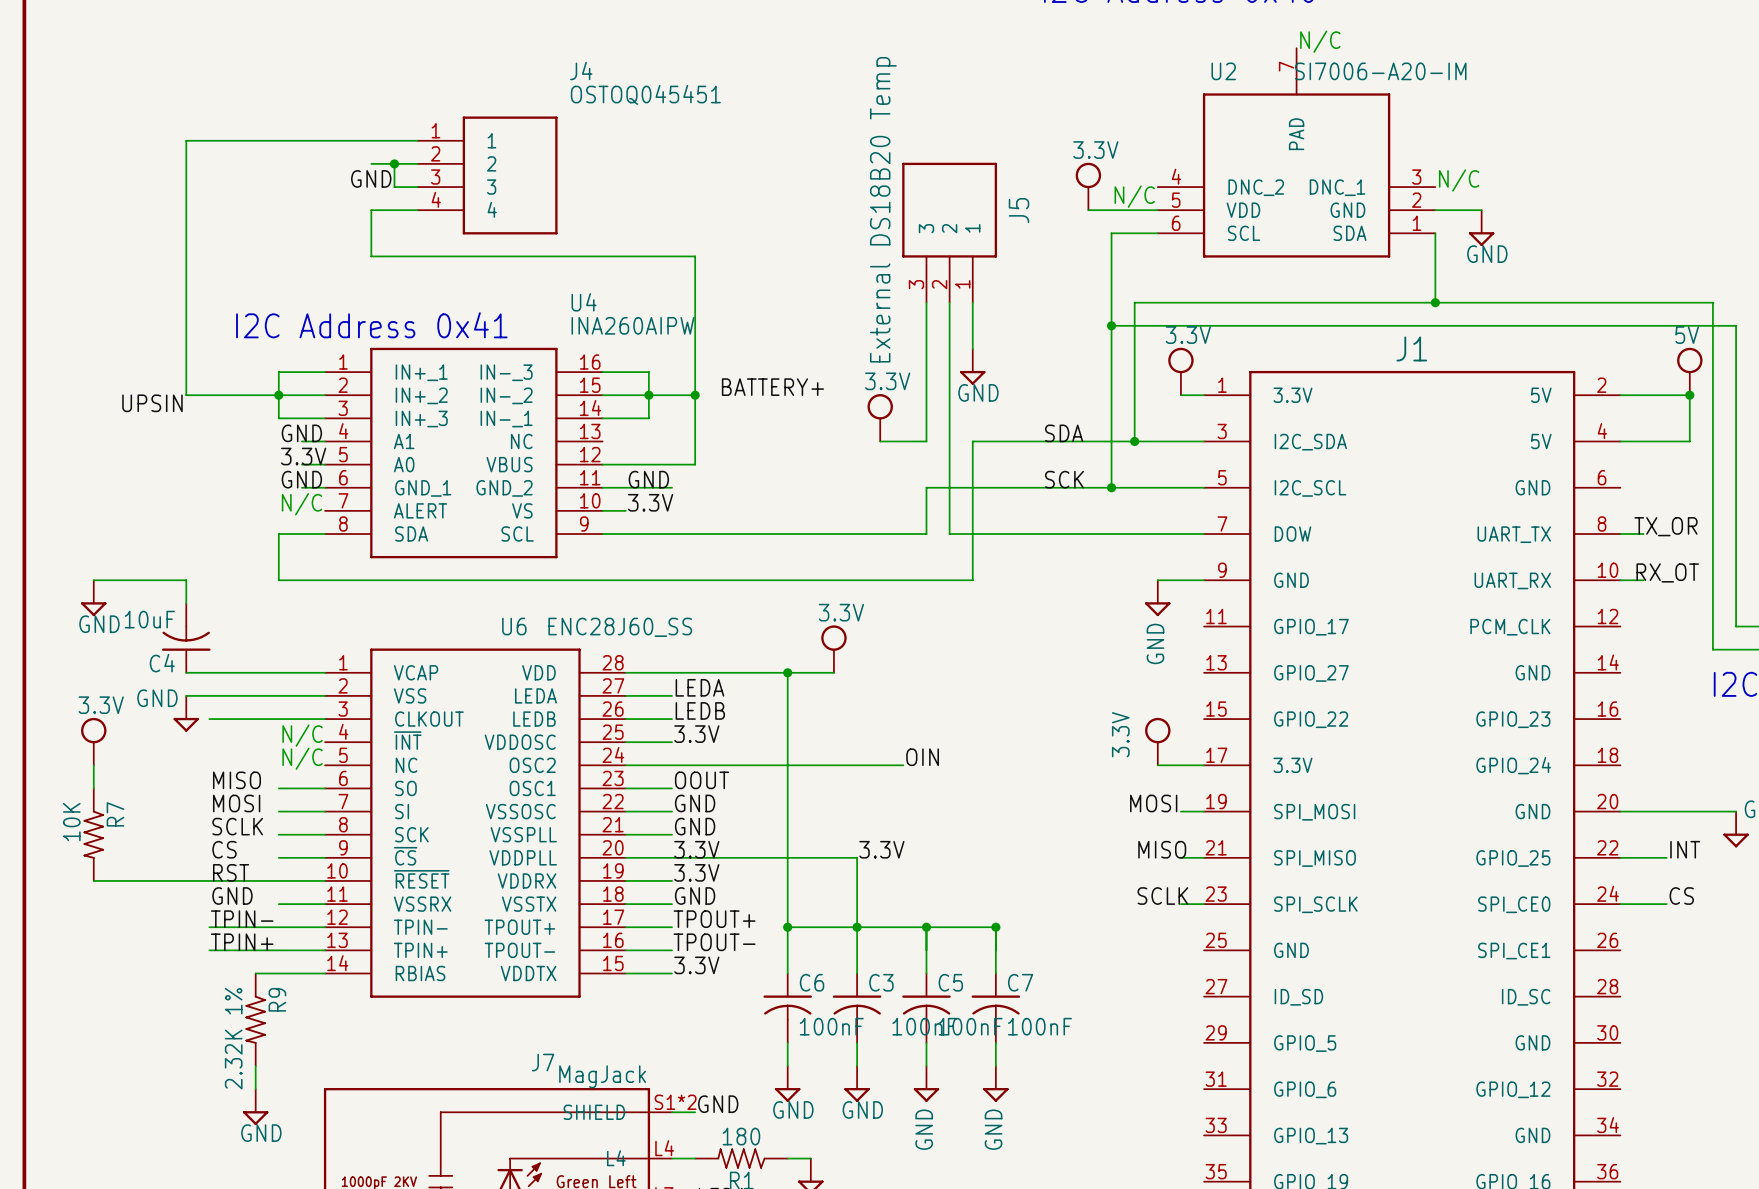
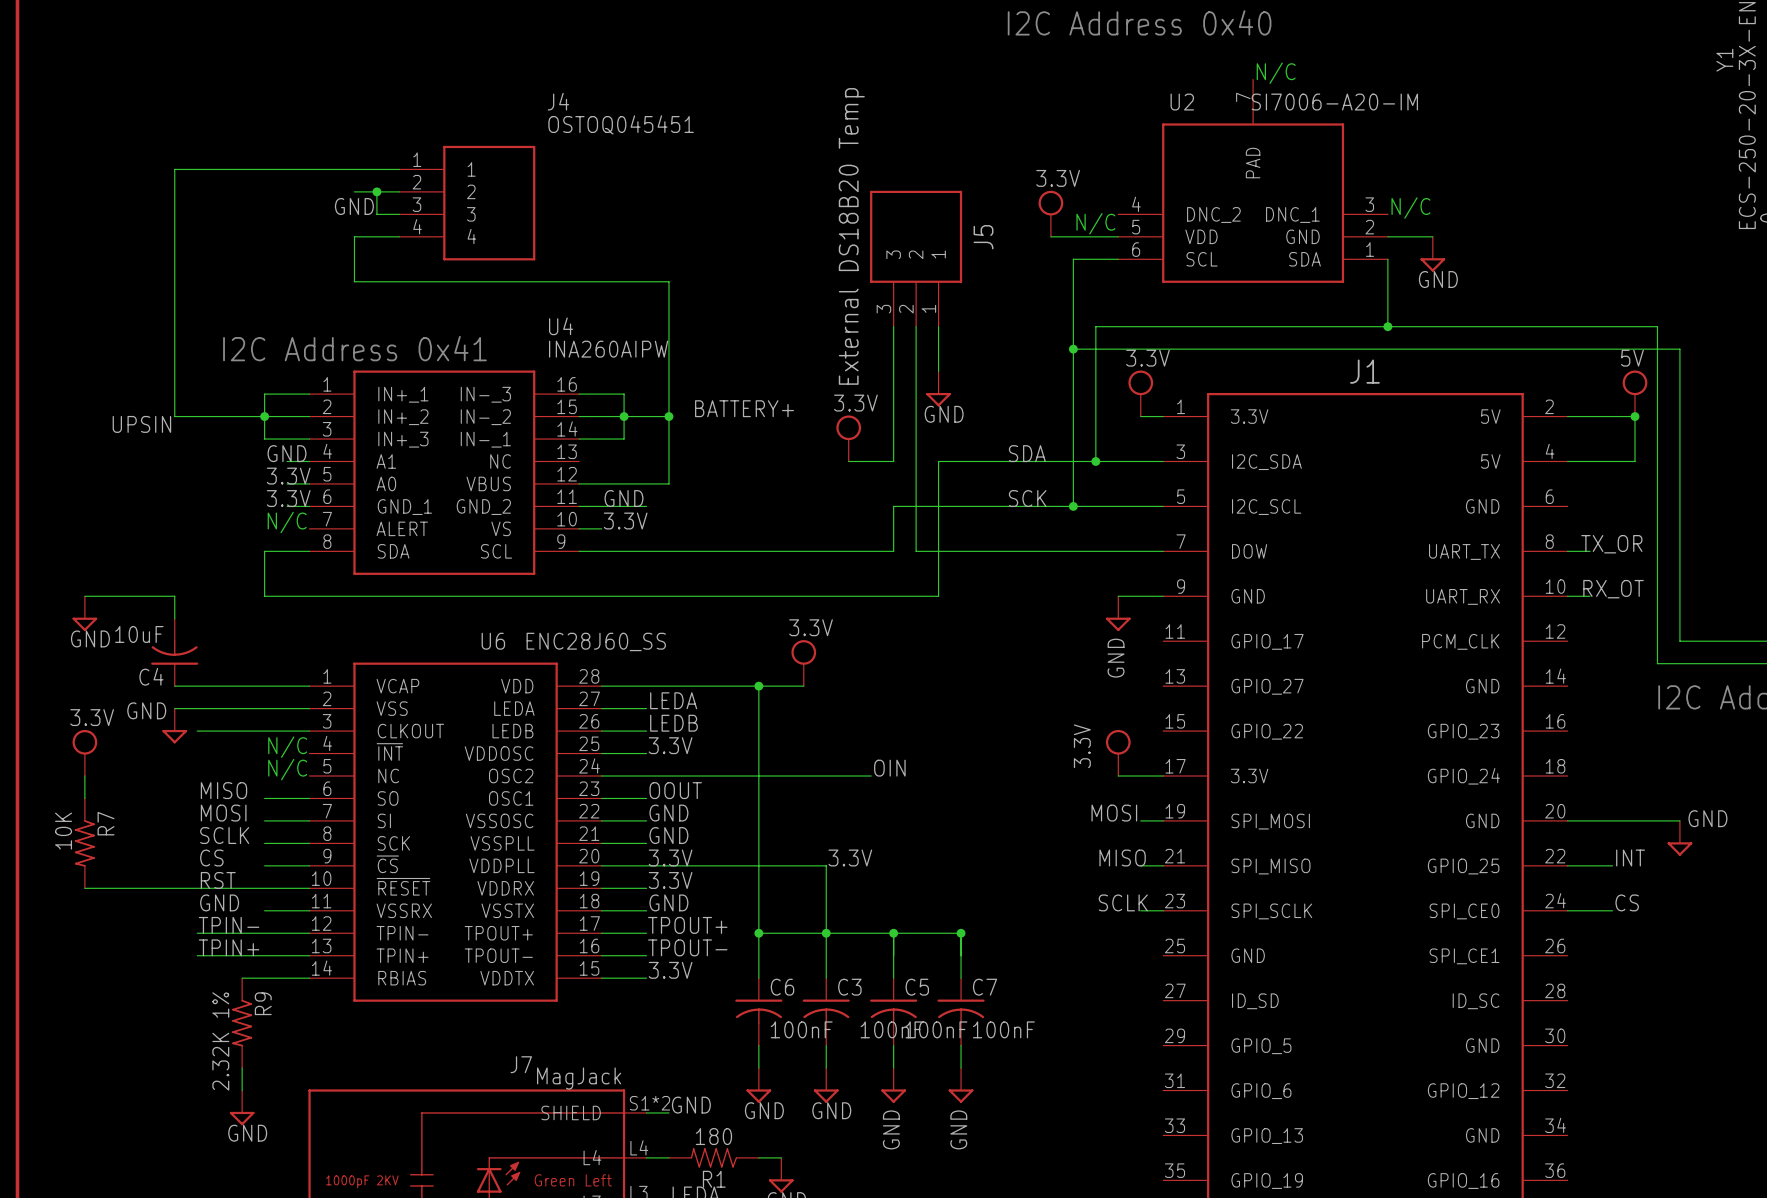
label: GND (301, 479) -> 3.3V (288, 498)

